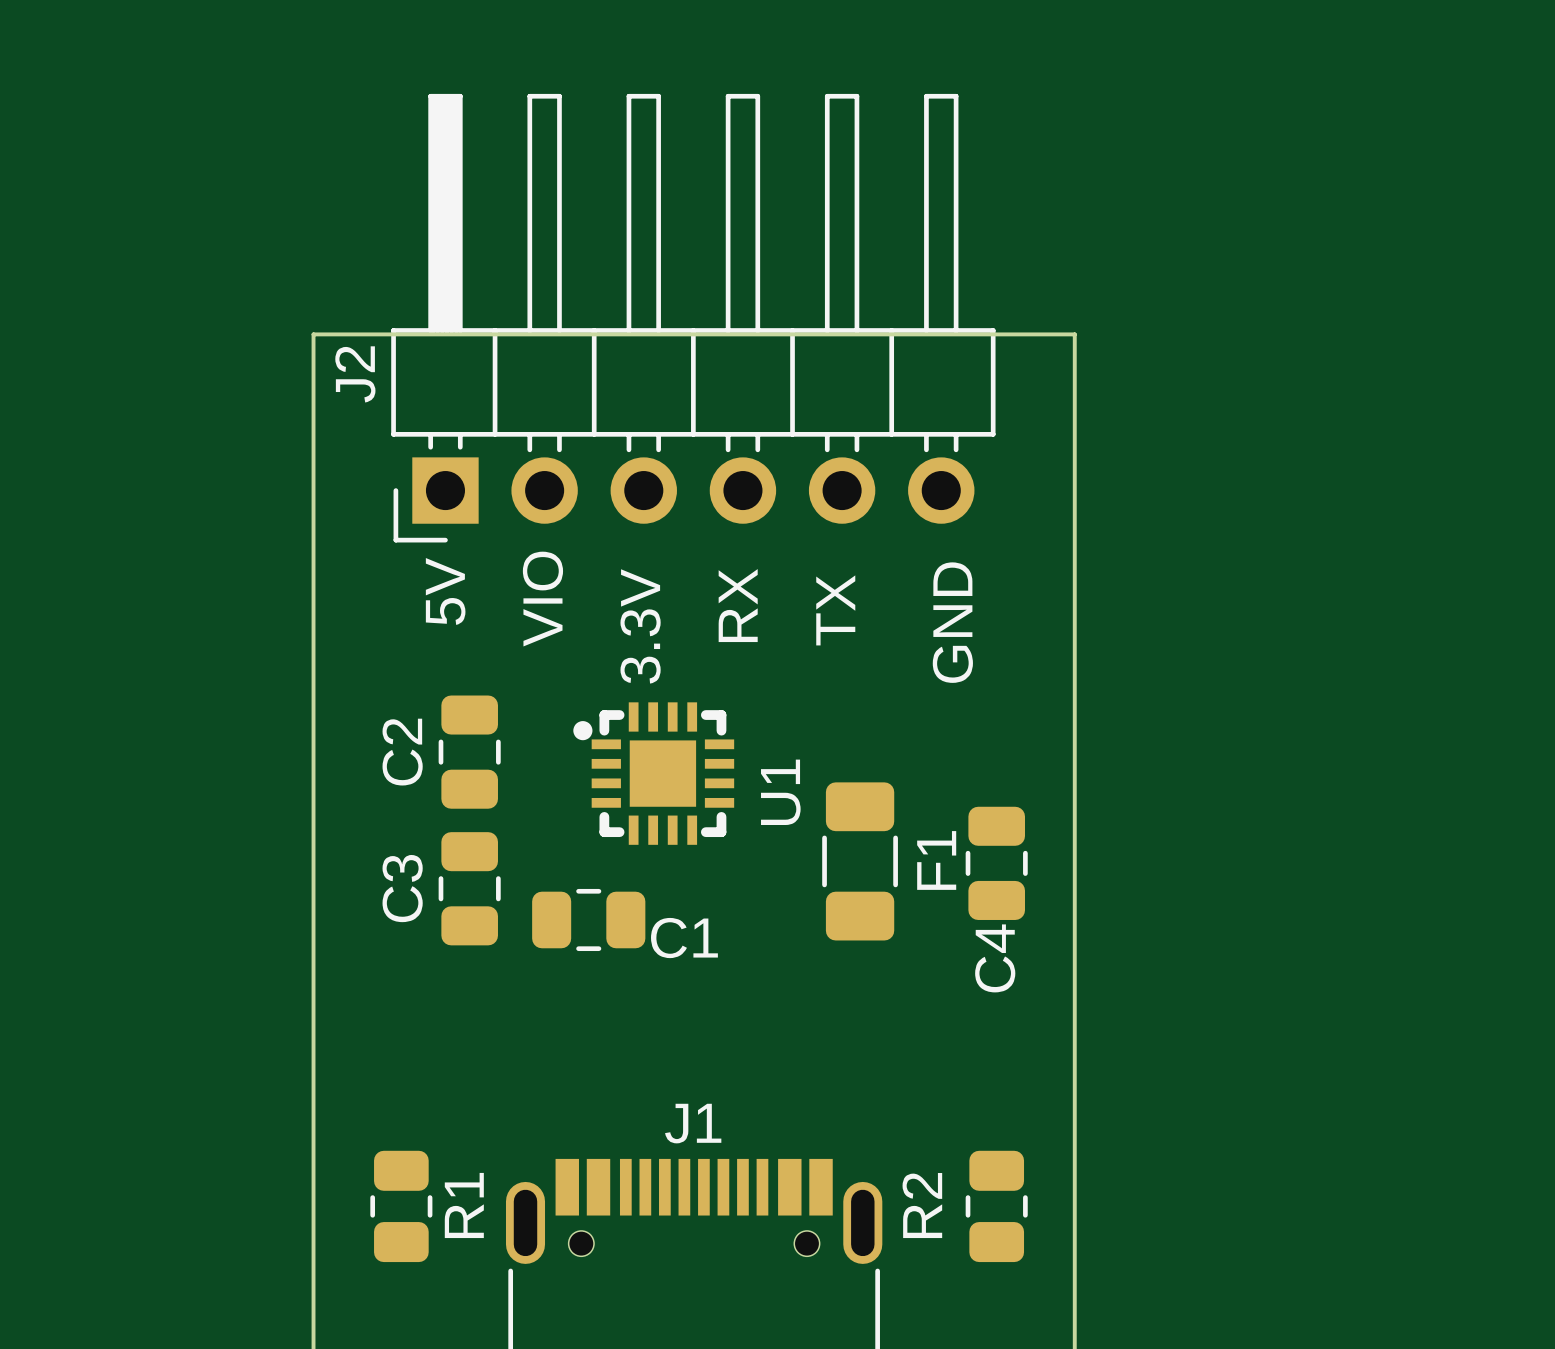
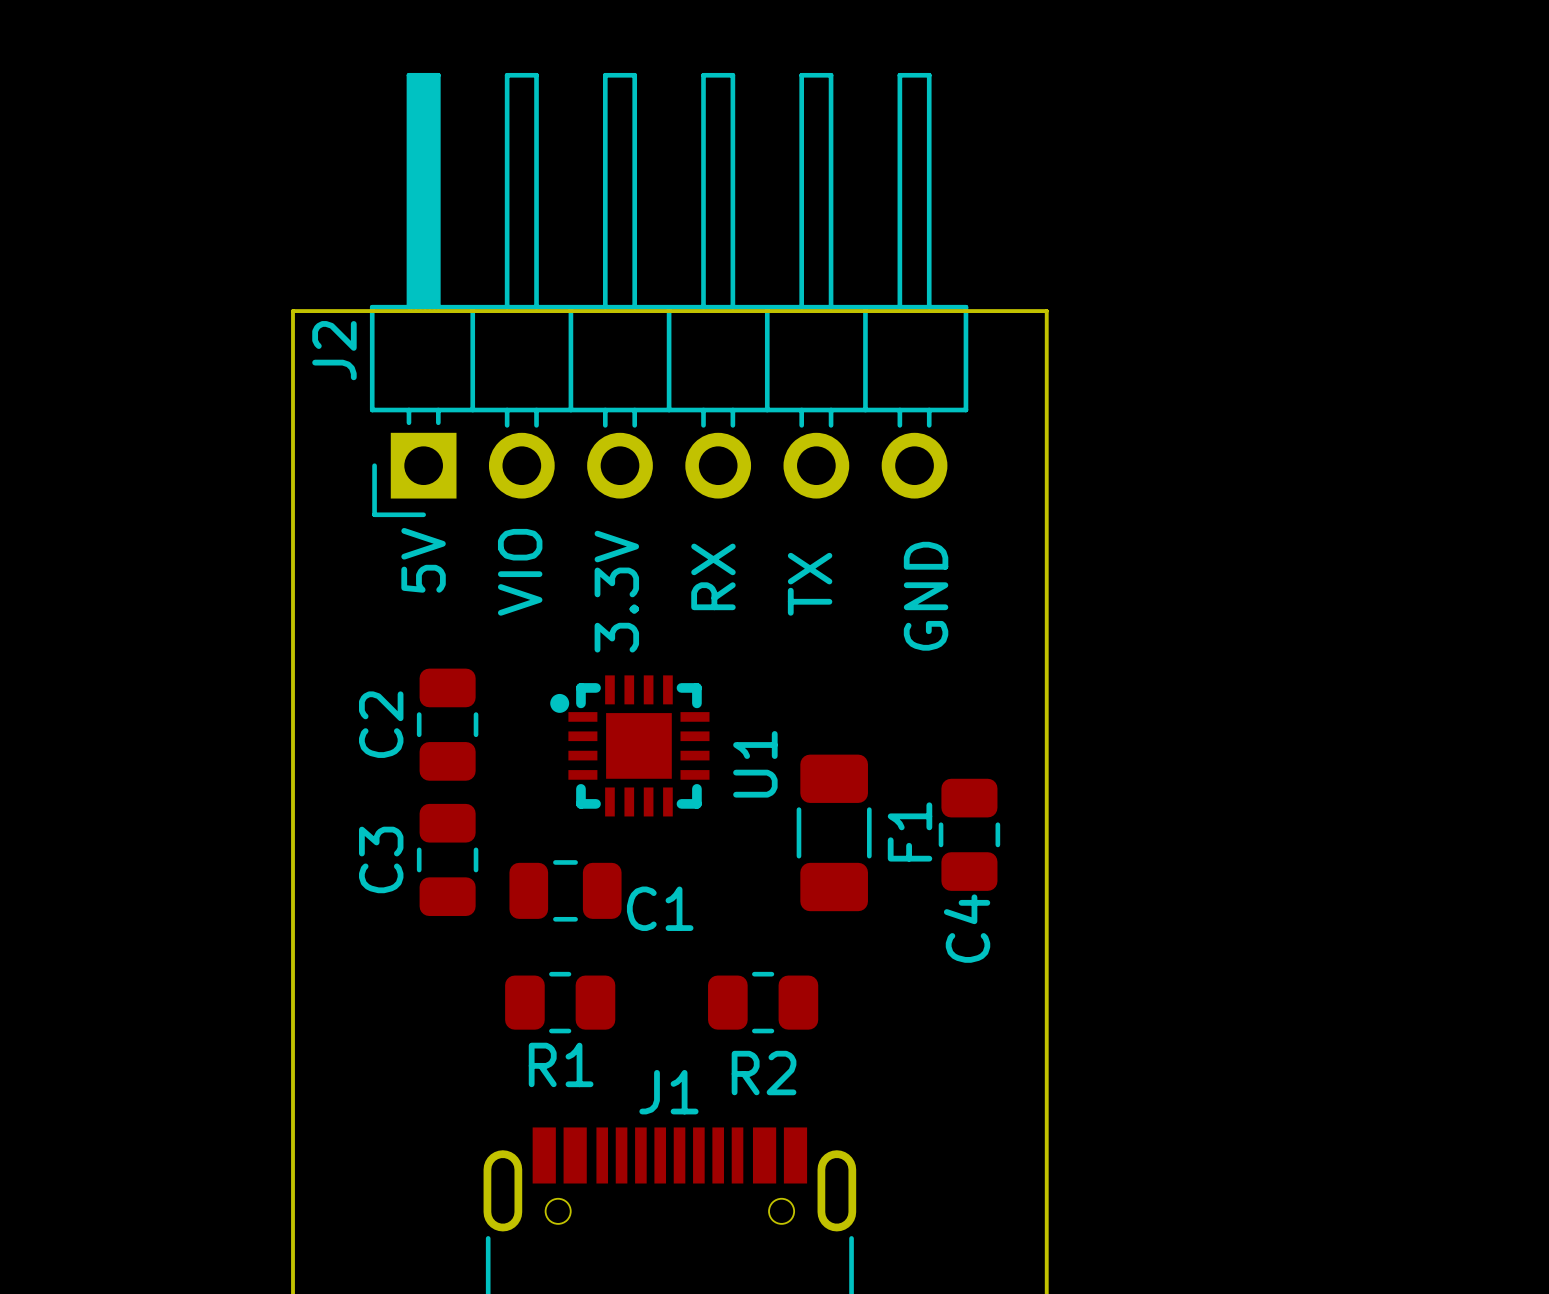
R2 name position: R2 (922, 1205) -> R2 (764, 1073)
R1 rotation: 0° (401, 1206) -> 90° clockwise (560, 1002)
R1 position: (401, 1206) -> (560, 1002)
R2 rotation: 0° (996, 1206) -> 90° clockwise (763, 1002)
R2 position: (996, 1206) -> (763, 1002)

